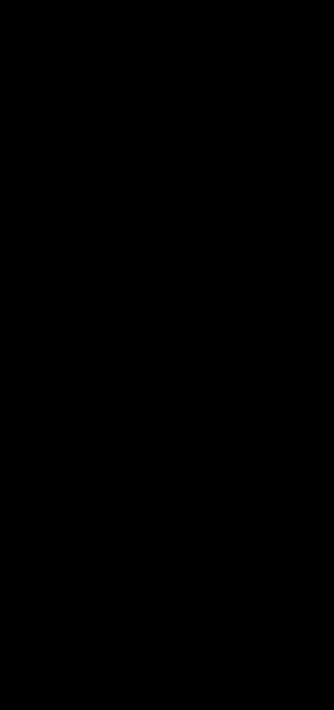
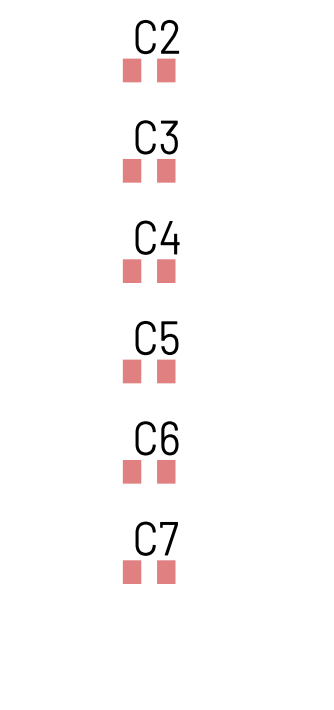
C2: none -> (149, 70)
C3: none -> (149, 170)
C4: none -> (149, 271)
C5: none -> (149, 371)
C6: none -> (149, 471)
C7: none -> (149, 572)

